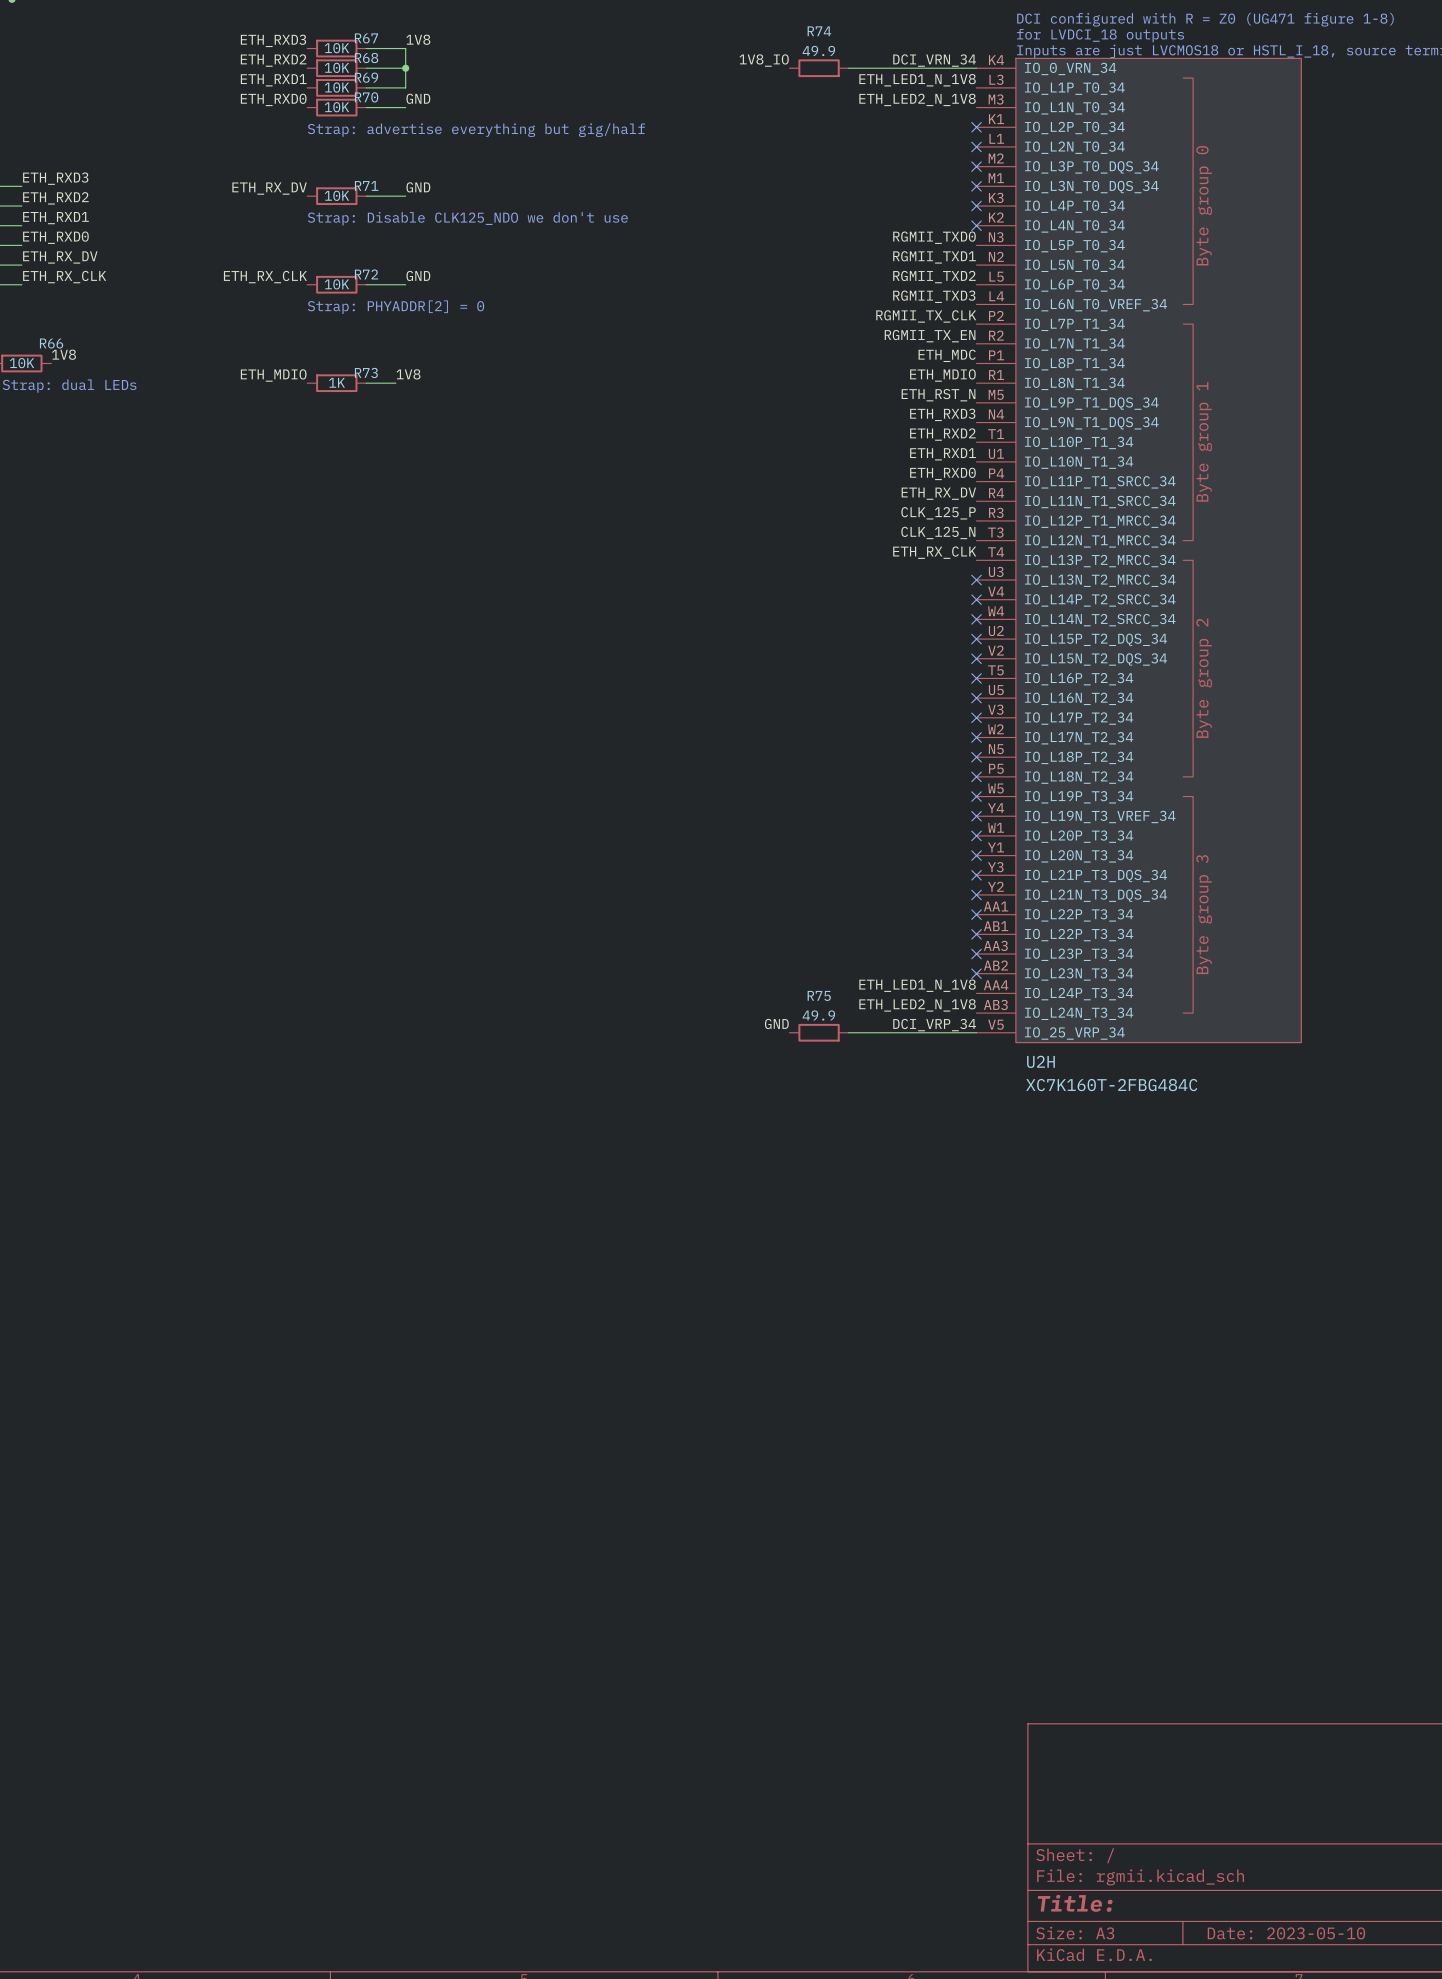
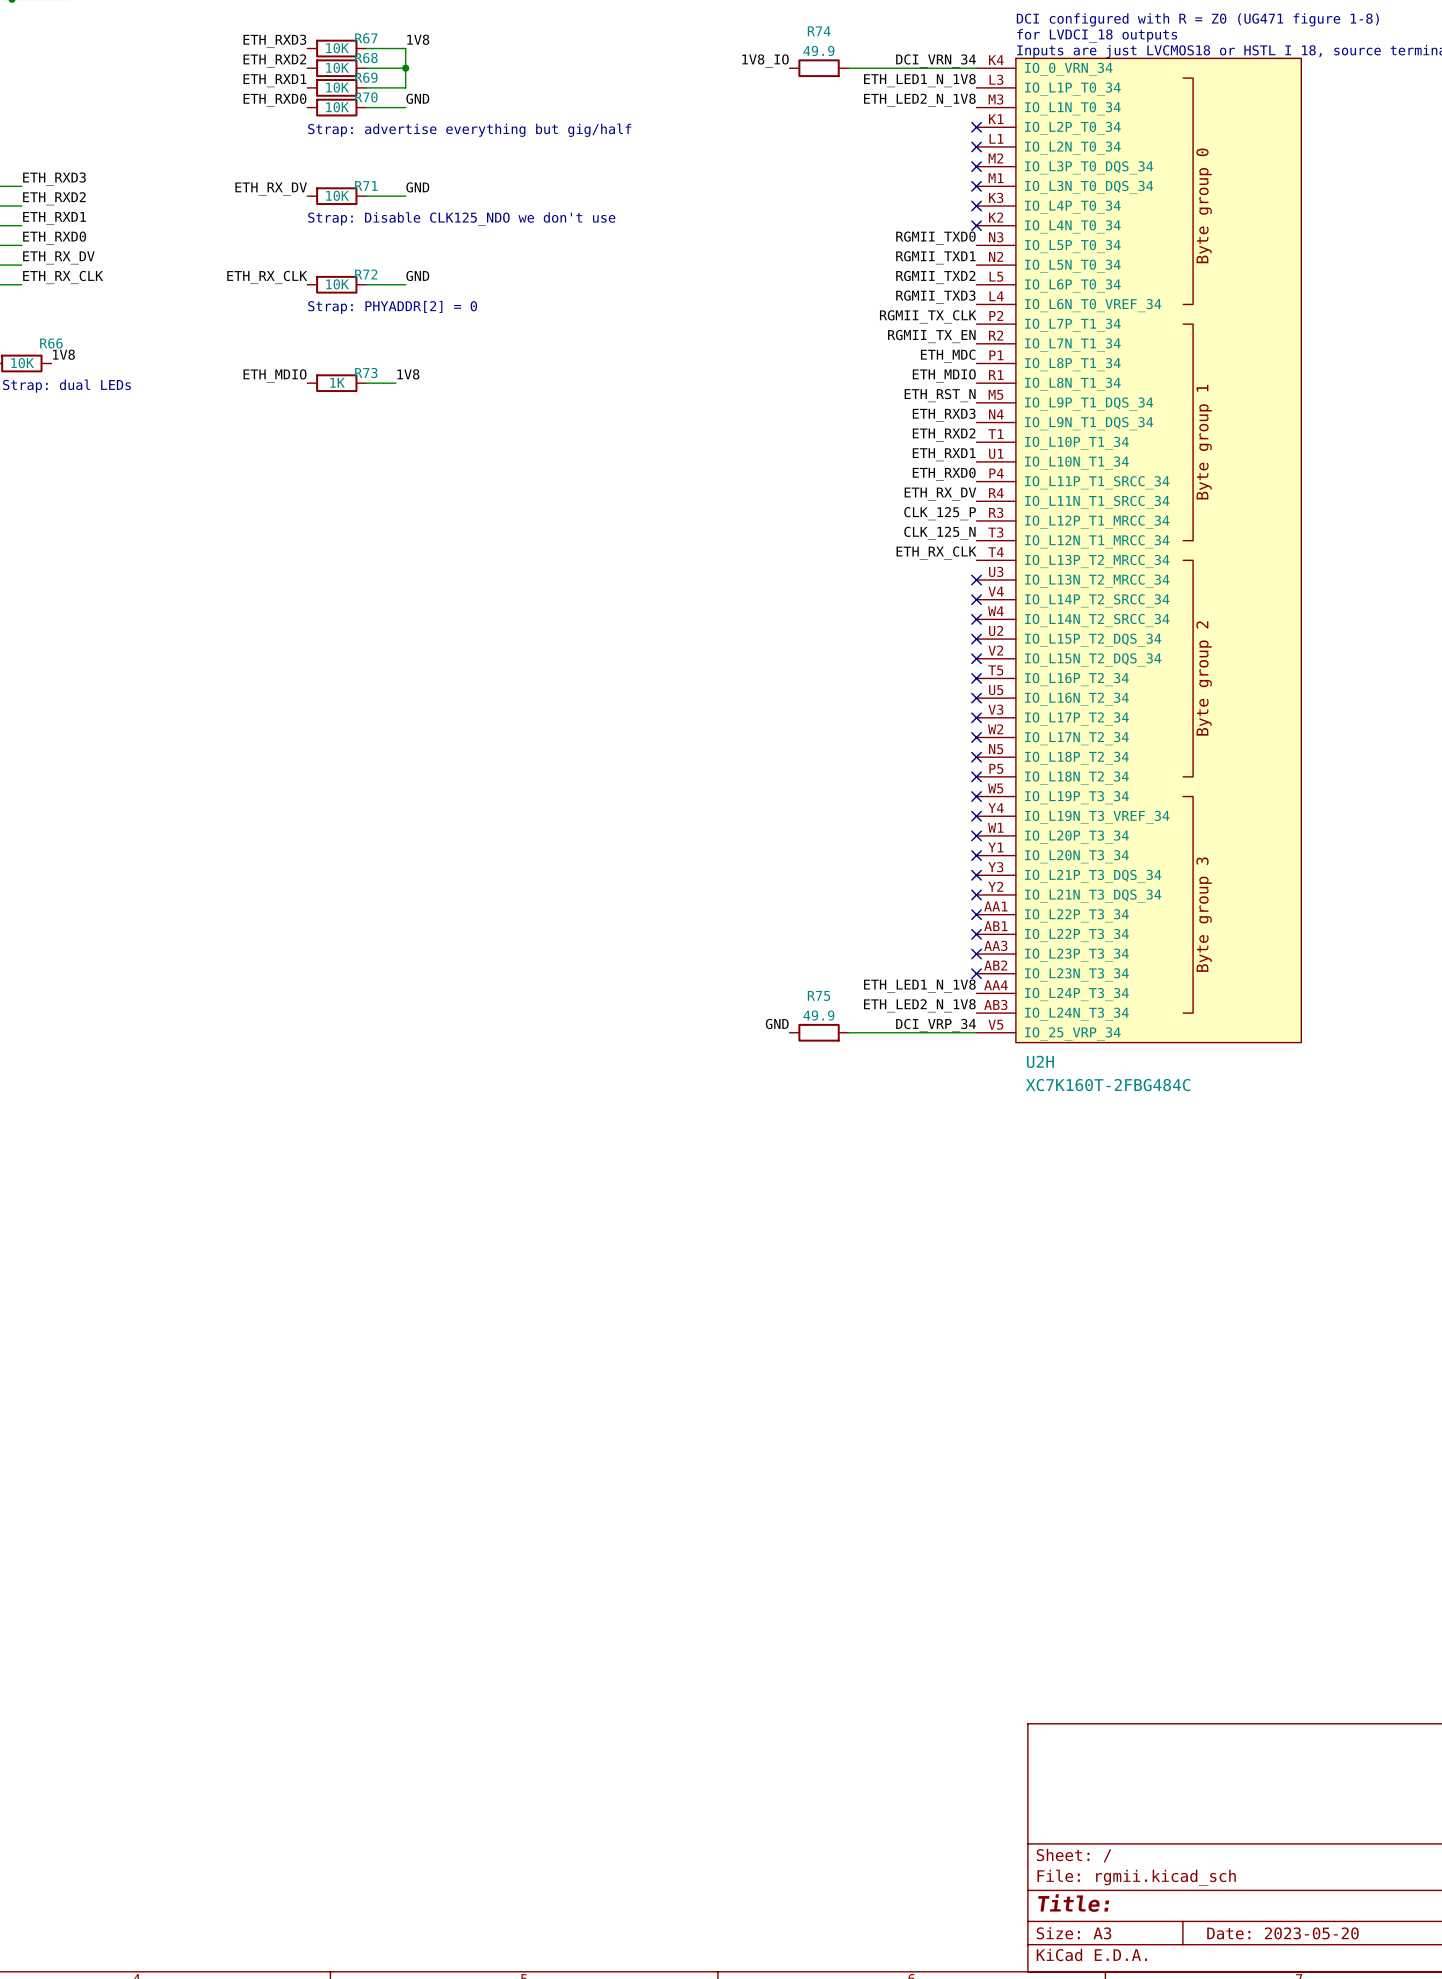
title block: Date: 2023-05-10 (1286, 1933) -> Date: 2023-05-20 (1282, 1933)

